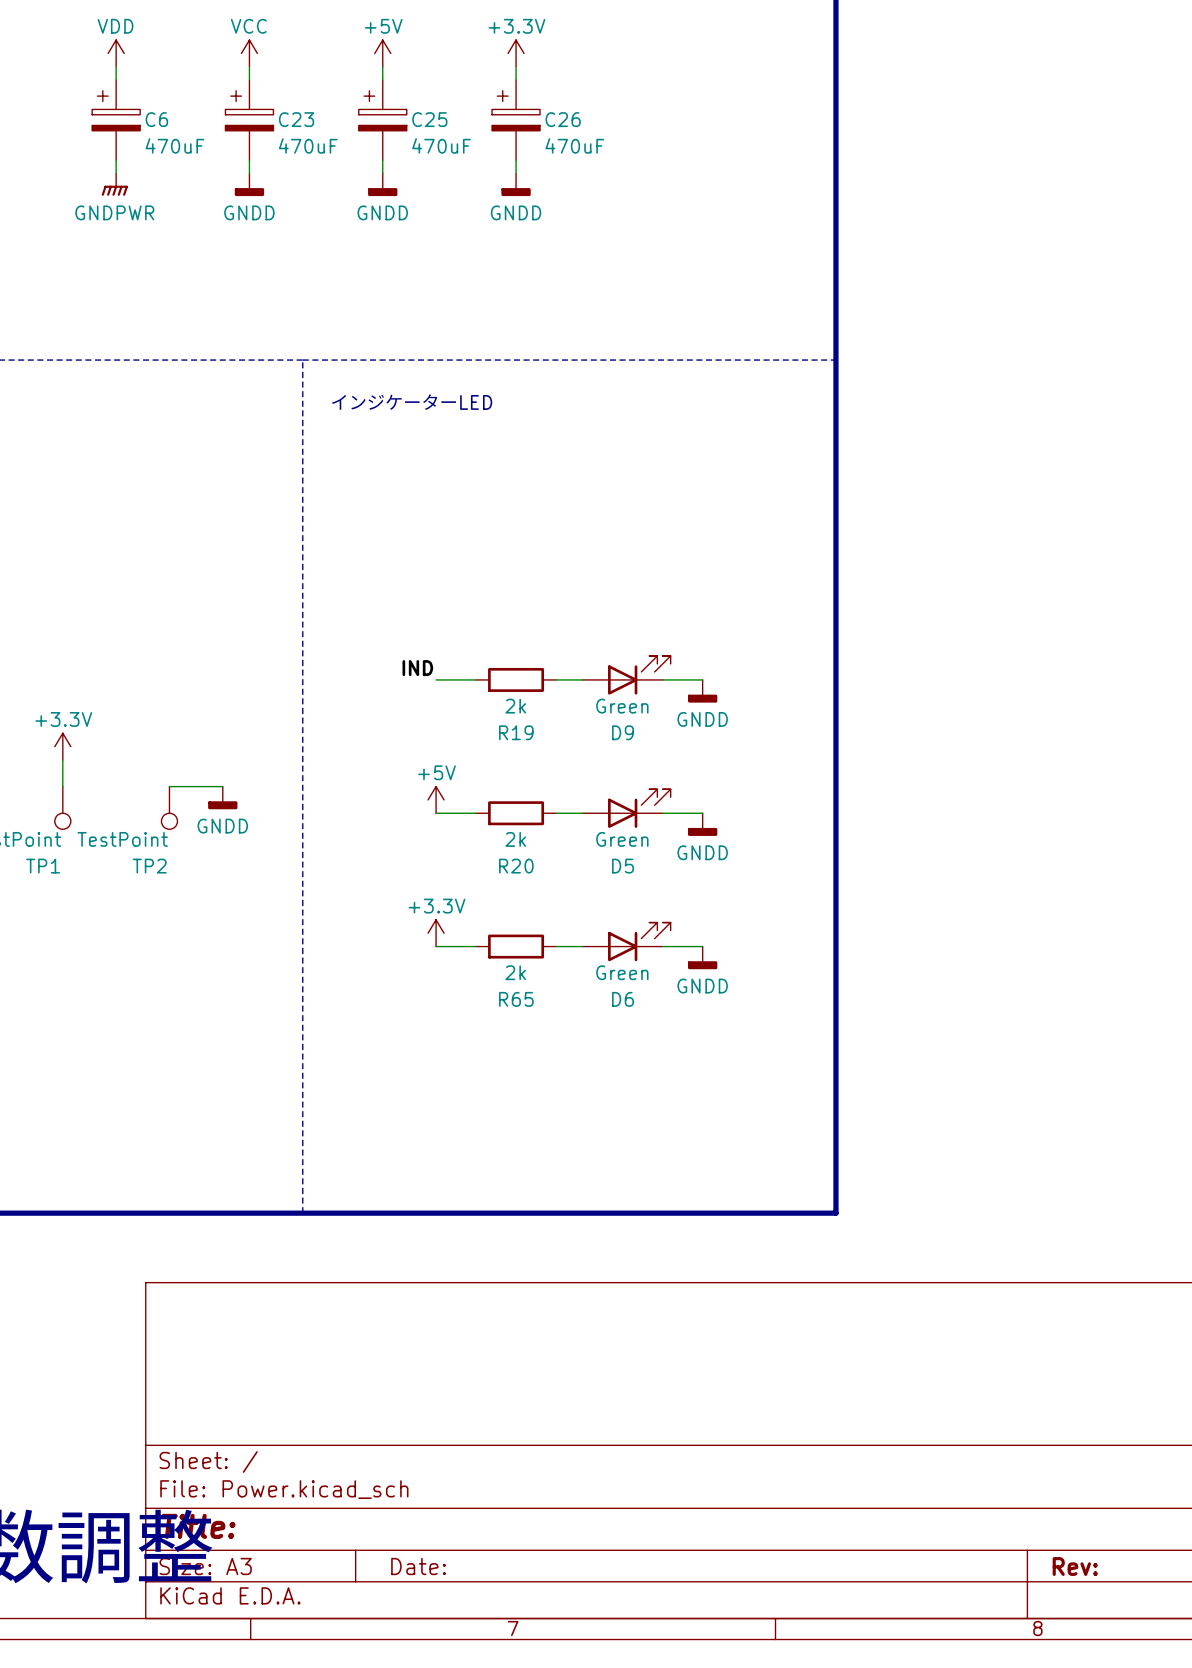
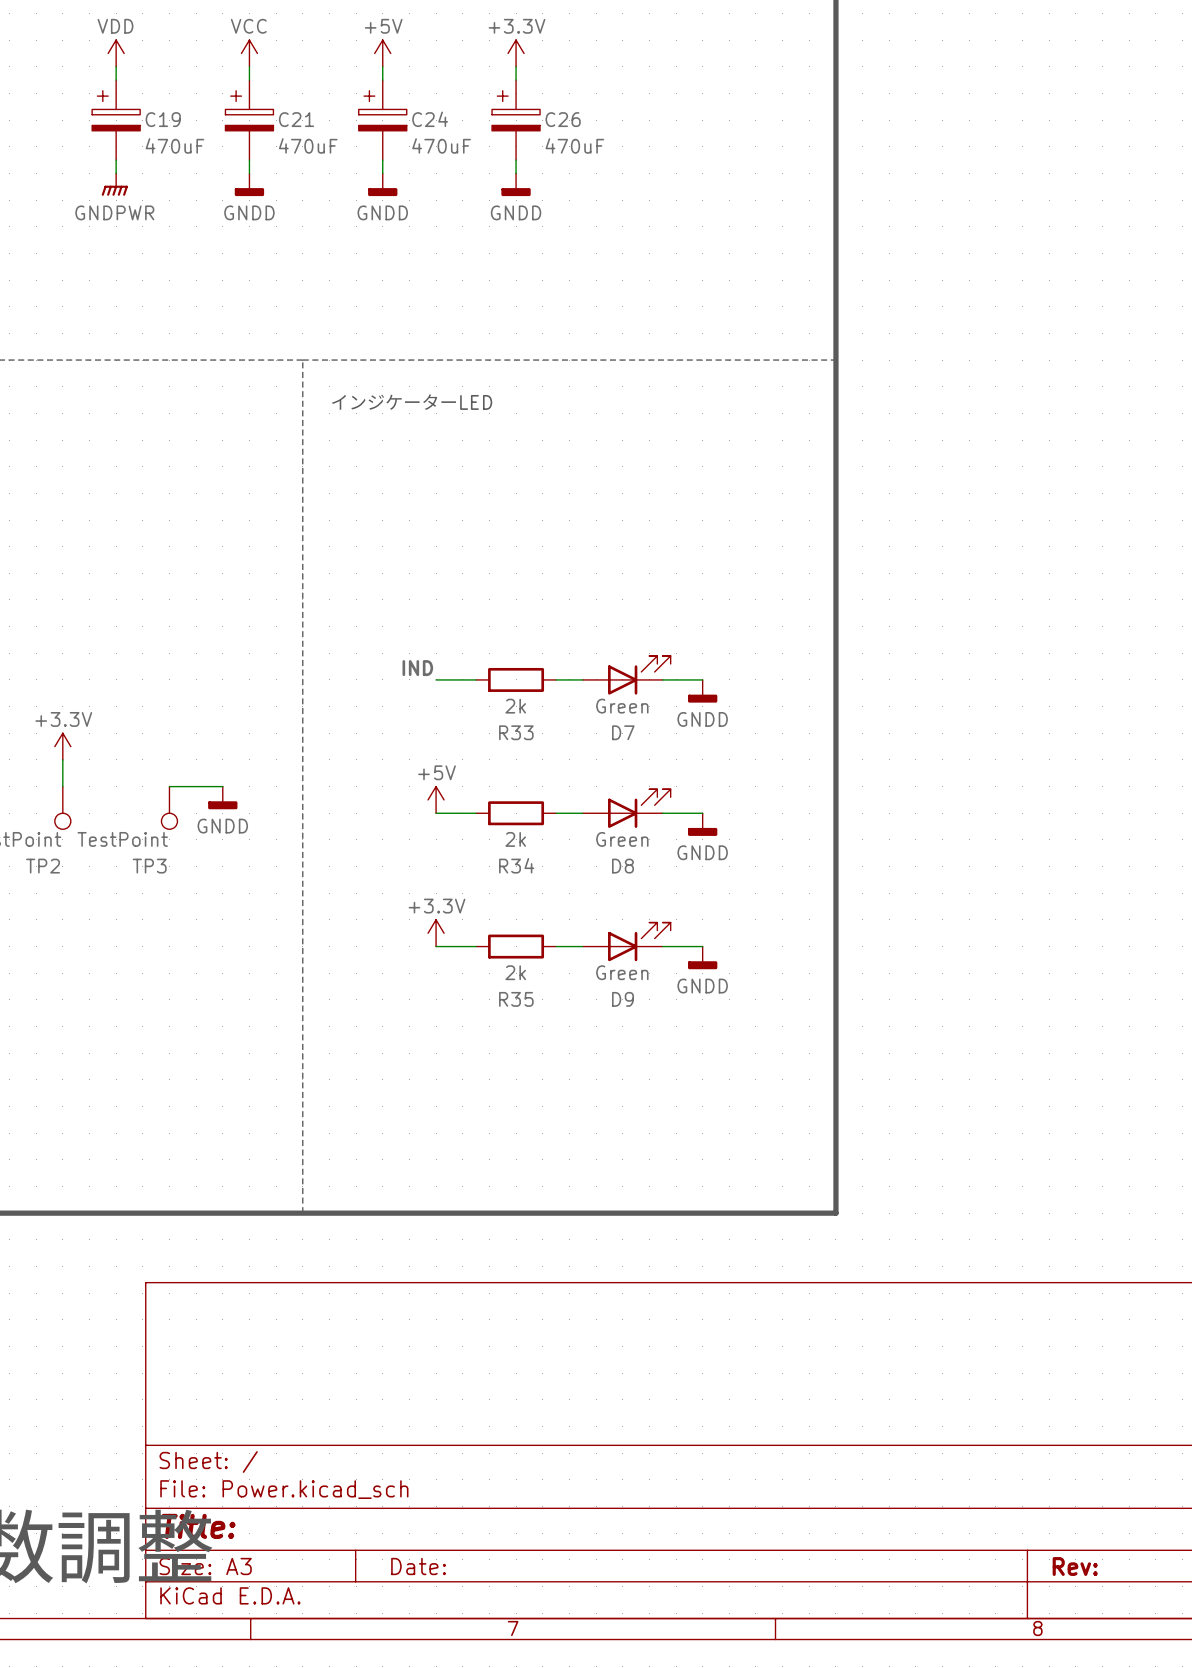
C6 name: C6 (156, 119) -> C19 (163, 119)
C23 name: C23 (296, 119) -> C21 (296, 119)
C25 name: C25 (429, 119) -> C24 (430, 119)
R19 name: R19 (516, 732) -> R33 (516, 732)
D9 name: D9 (623, 732) -> D7 (623, 732)
TP1 name: TP1 (43, 866) -> TP2 (43, 866)
TP2 name: TP2 (149, 866) -> TP3 (149, 866)
R20 name: R20 (516, 866) -> R34 (516, 865)
D5 name: D5 (623, 866) -> D8 (623, 866)
R65 name: R65 (516, 999) -> R35 (516, 999)
D6 name: D6 (623, 999) -> D9 (623, 999)

